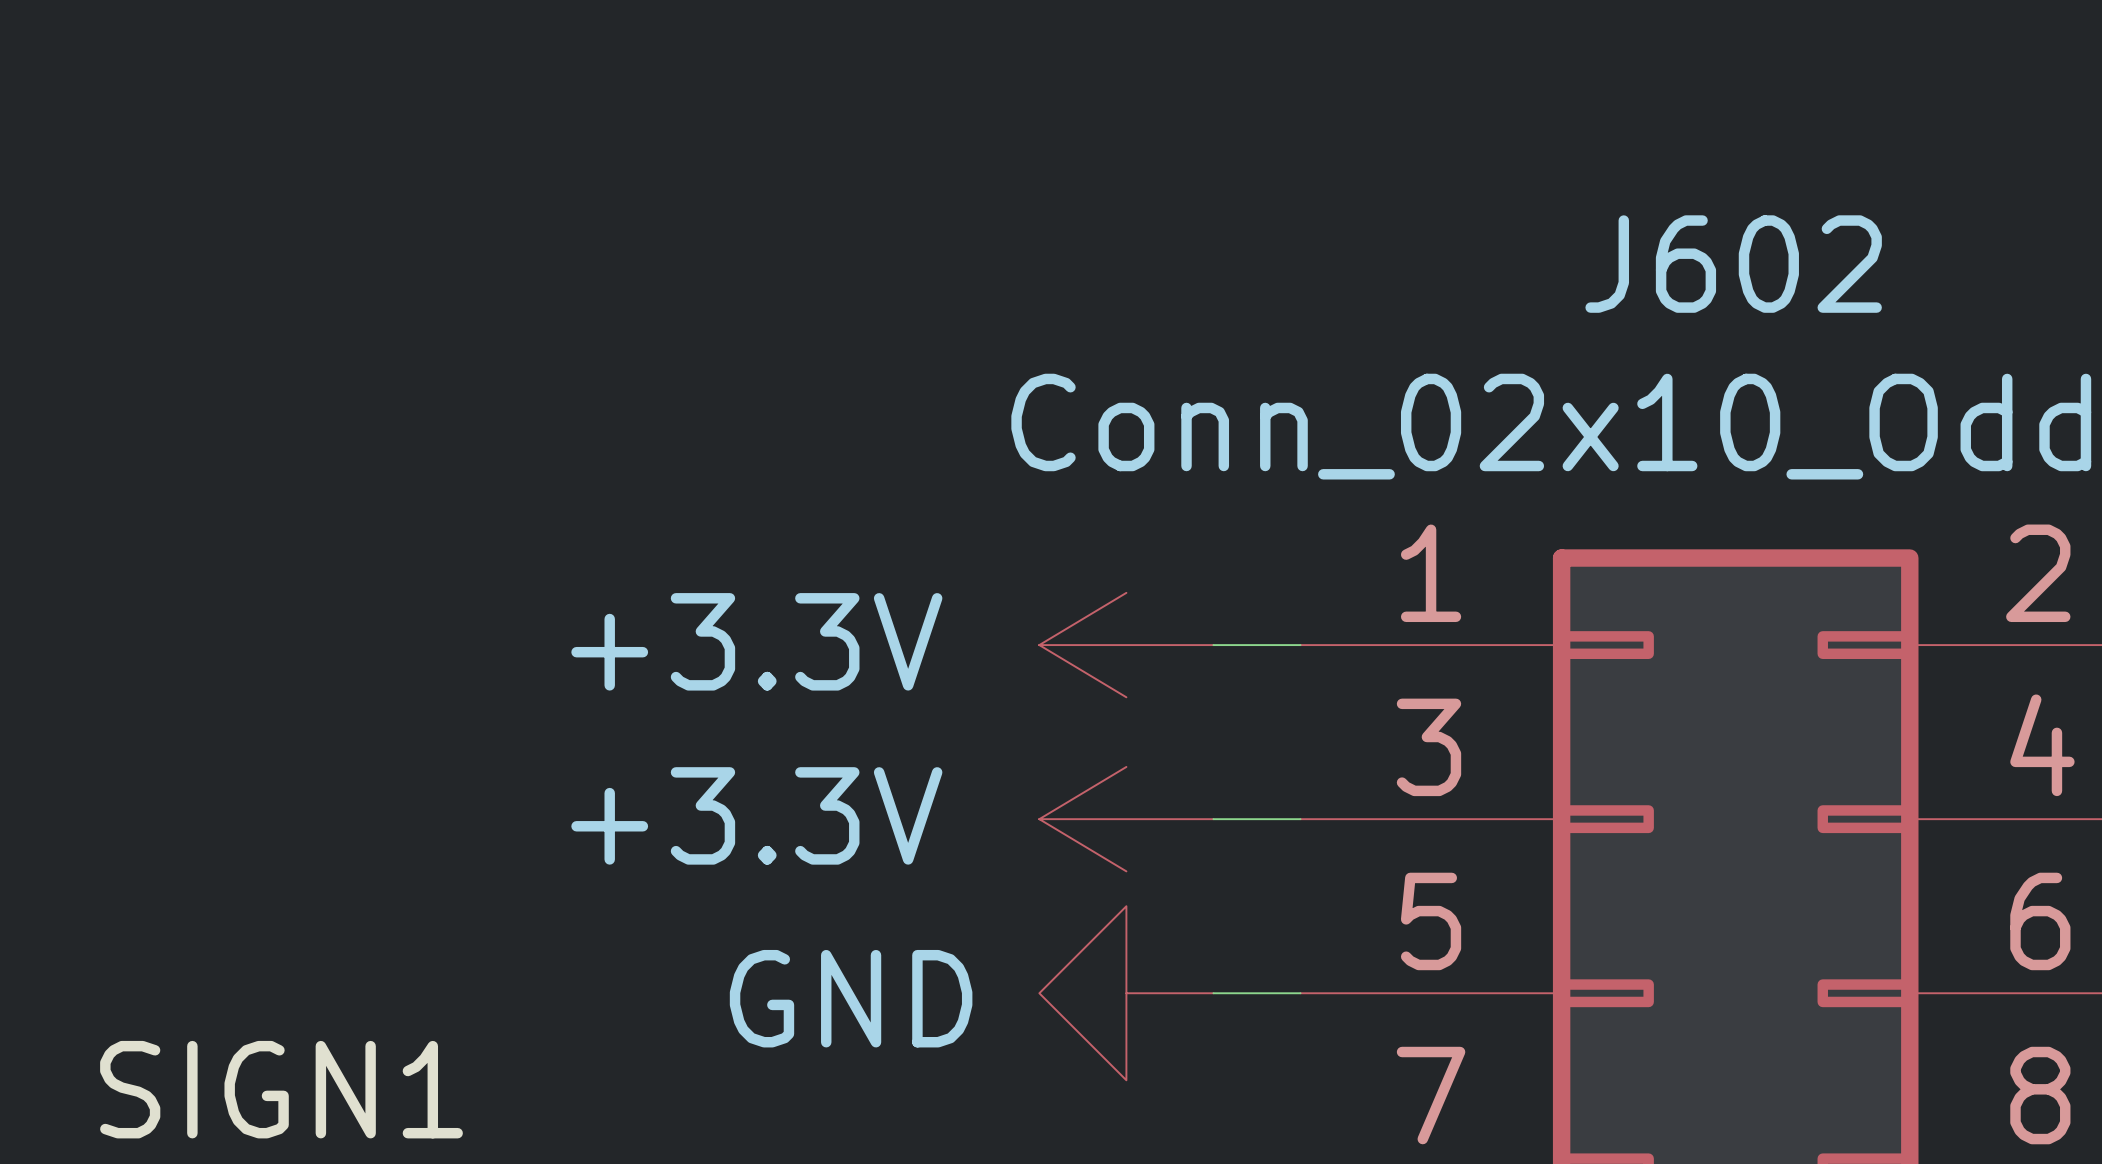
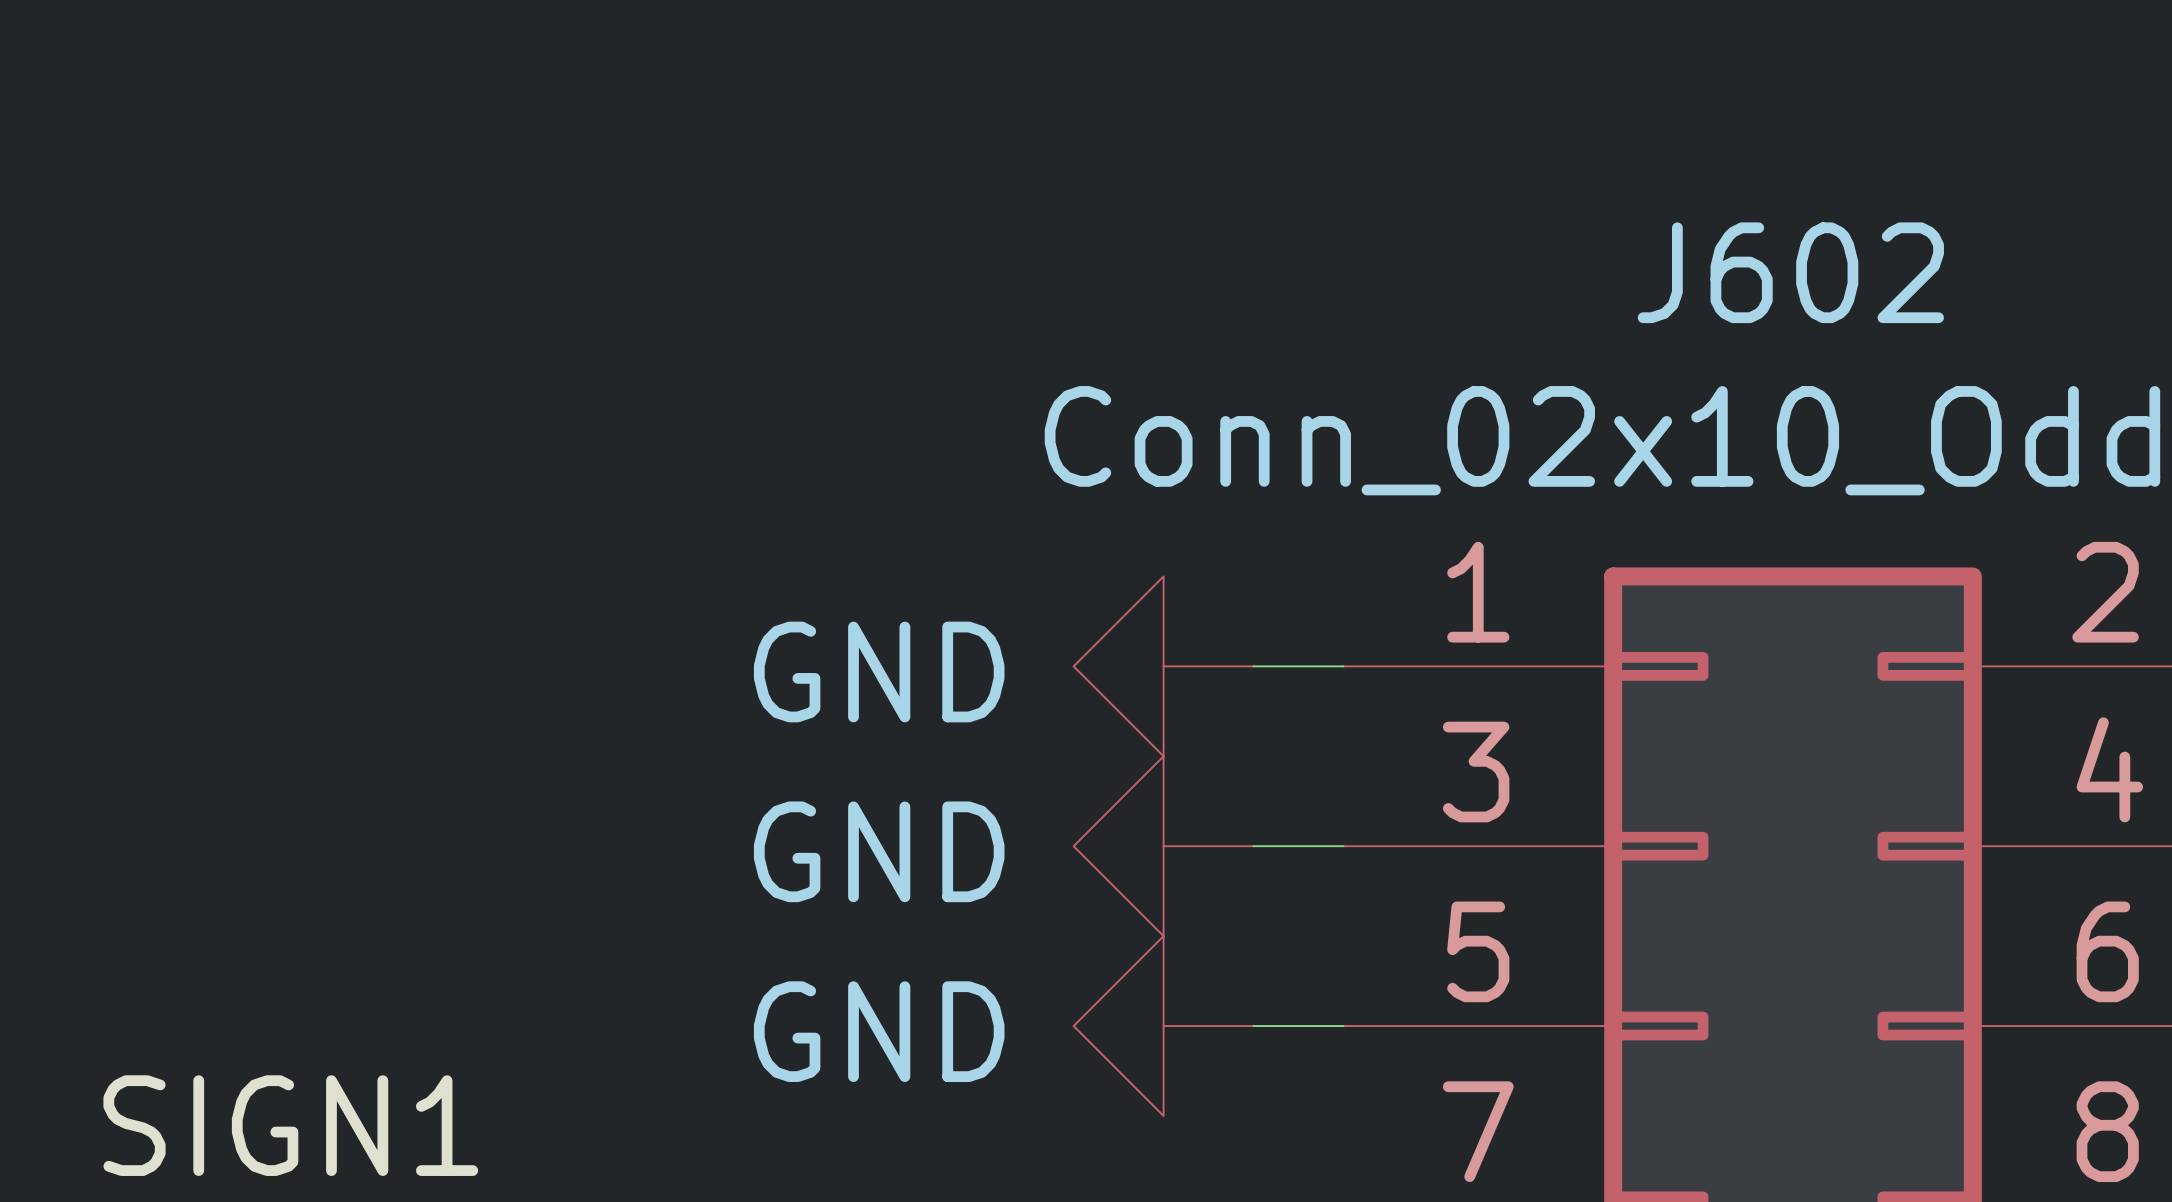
power symbol: +3.3V (1126, 645) -> GND (1163, 666)
power symbol: +3.3V (1126, 819) -> GND (1163, 846)

